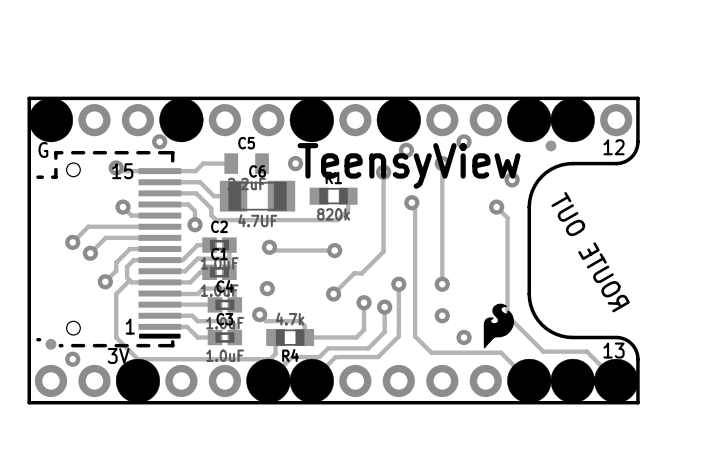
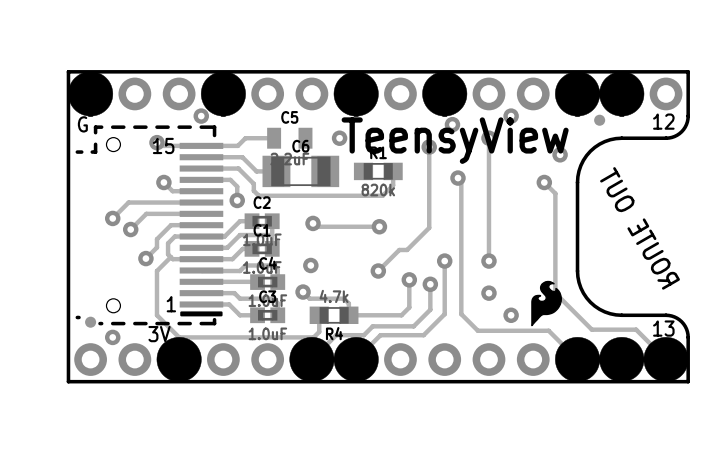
C6 value: 4.7UF (257, 220) -> none

